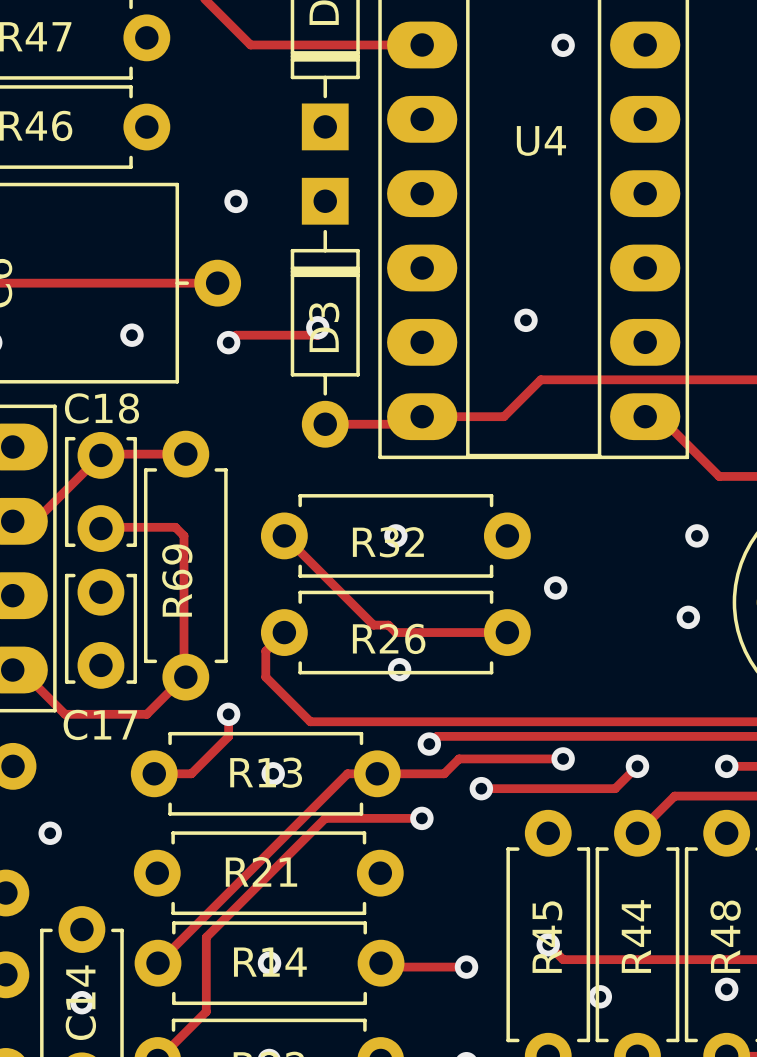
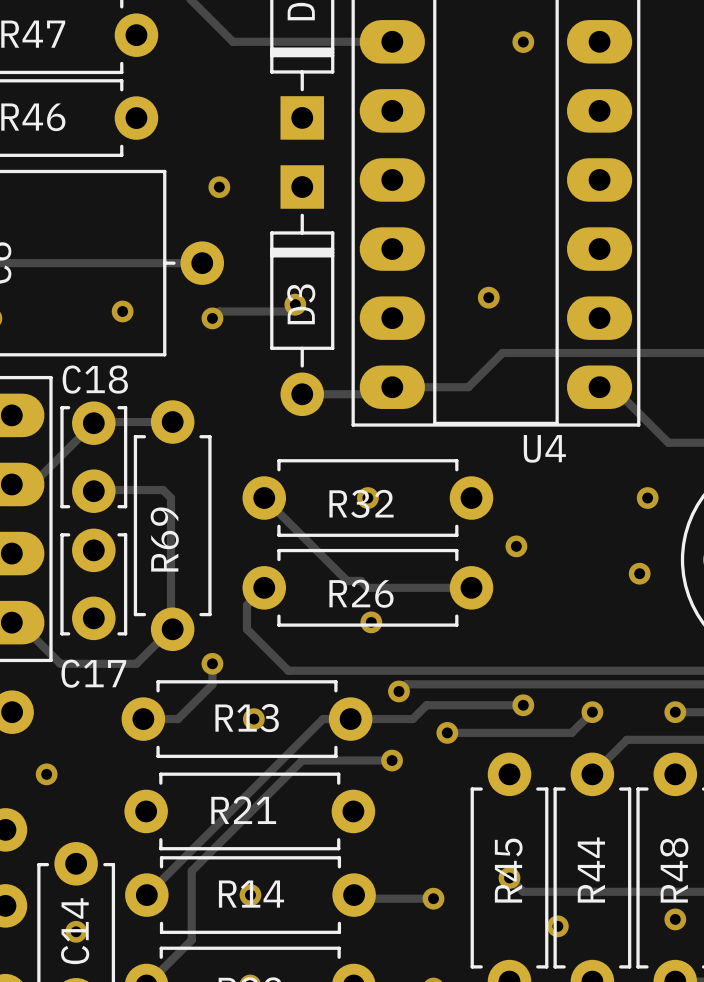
U4 name position: U4 (541, 140) -> U4 (544, 448)

